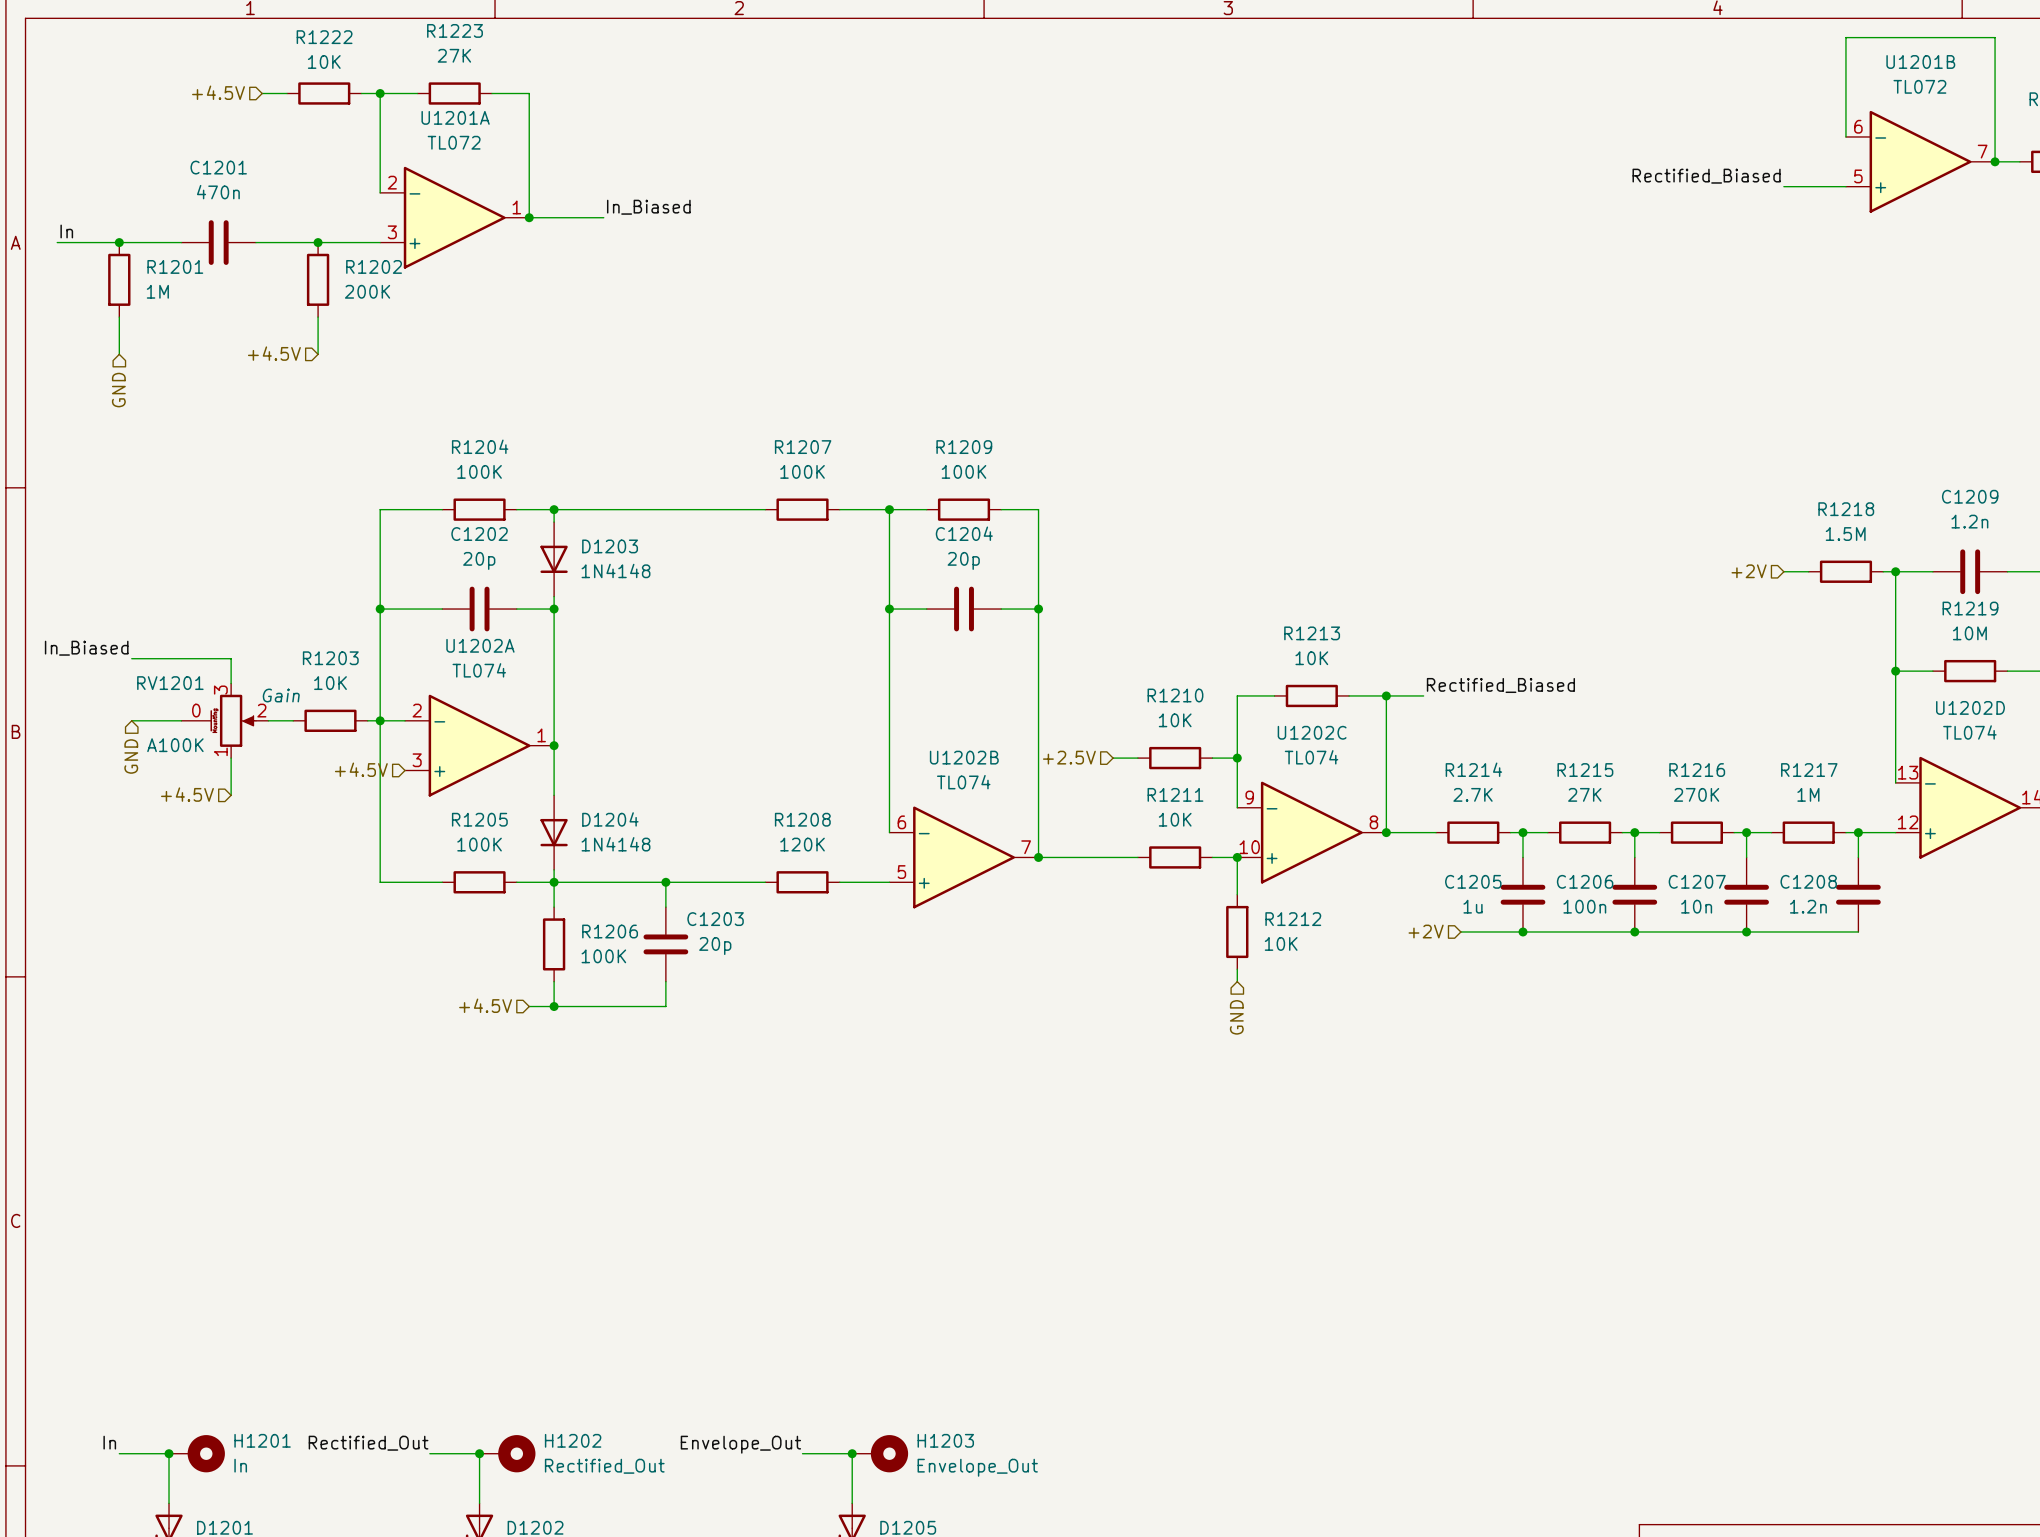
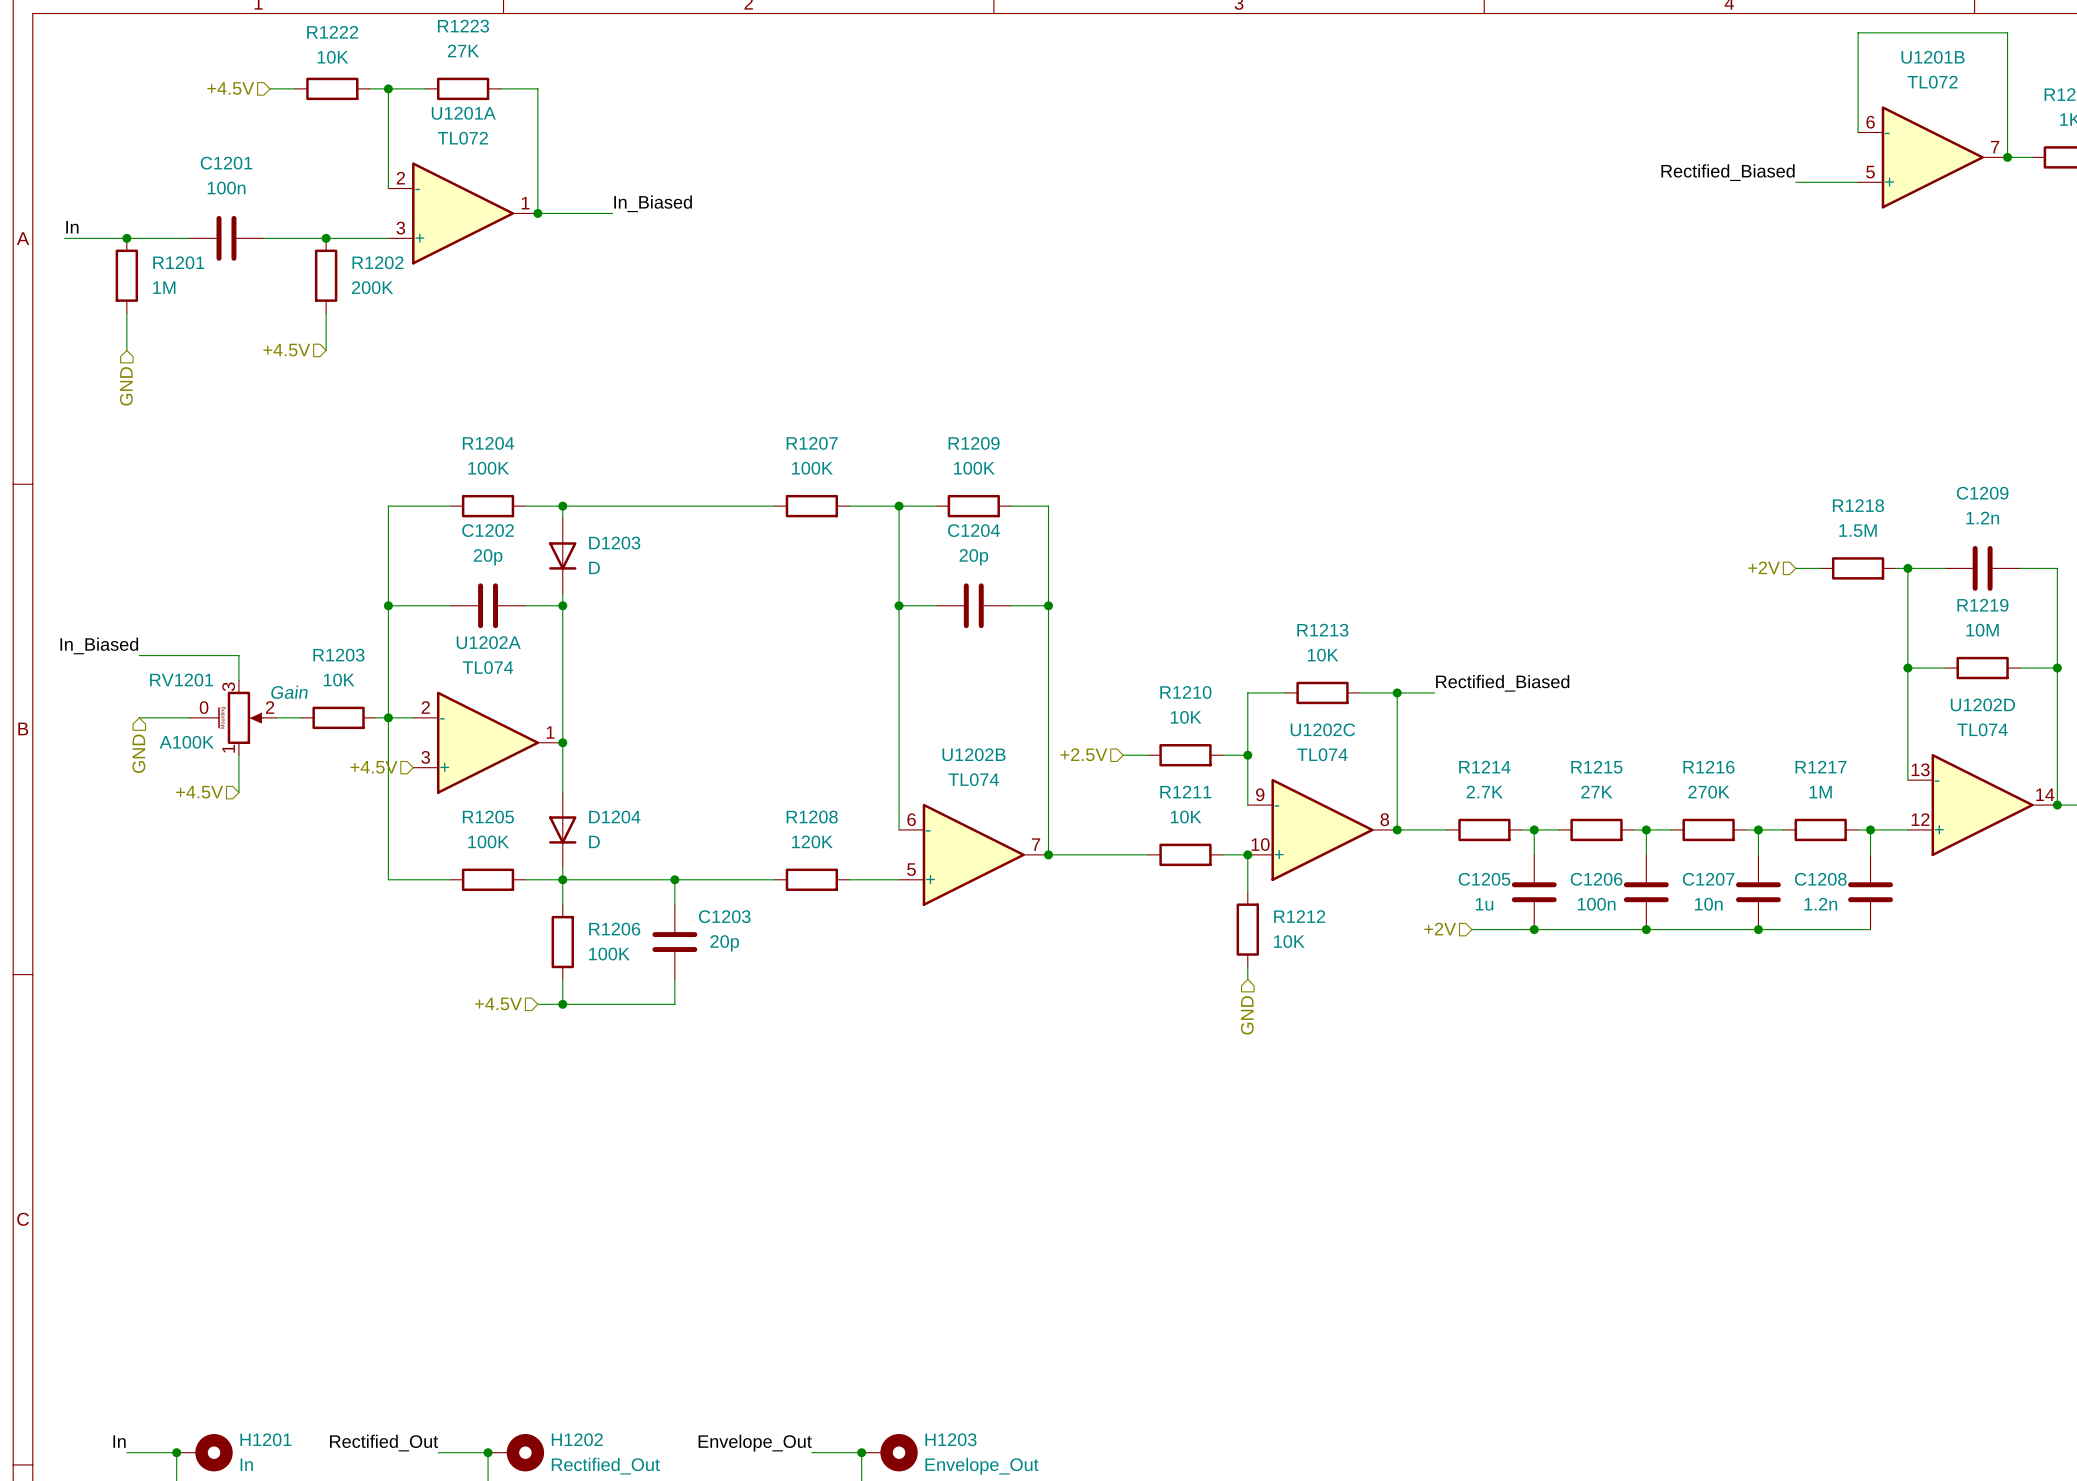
C1201 value: 470n (218, 192) -> 100n (226, 188)
D1203 value: 1N4148 (615, 570) -> D (594, 567)
D1204 value: 1N4148 (615, 844) -> D (594, 841)

